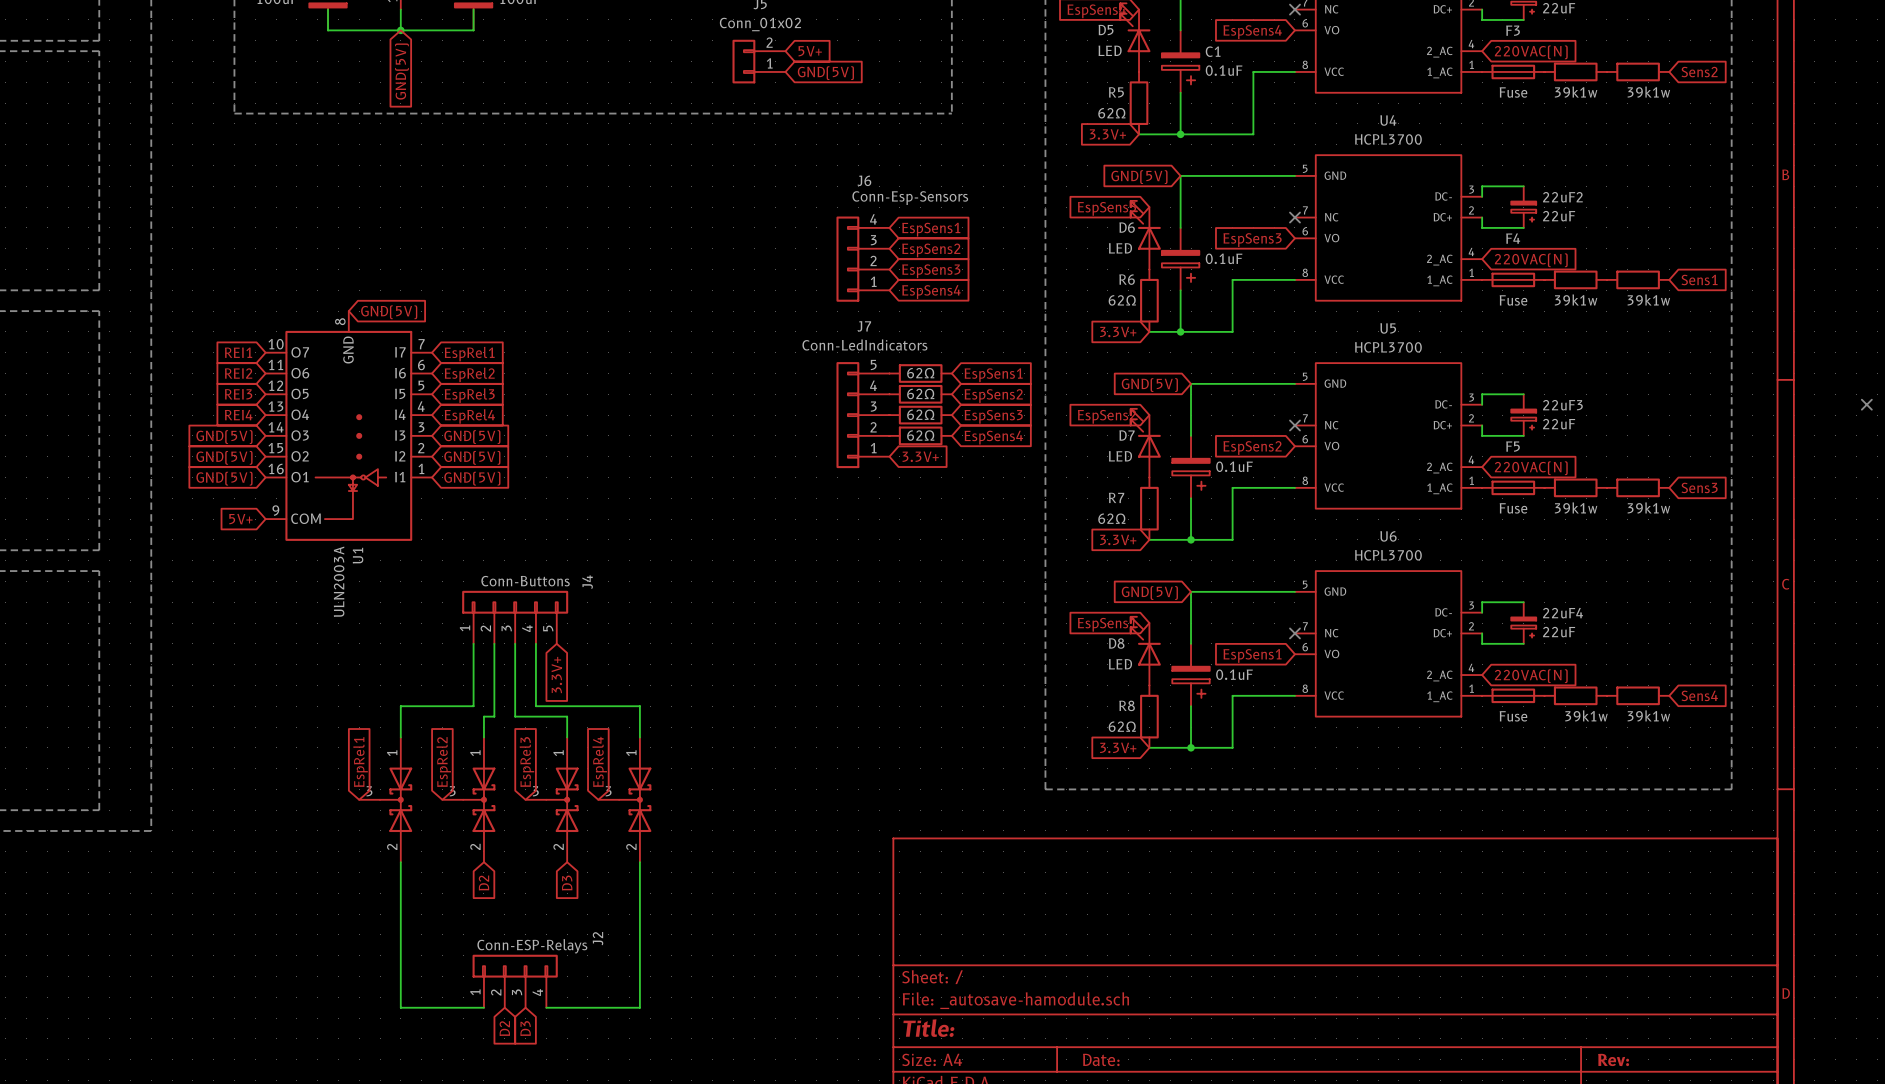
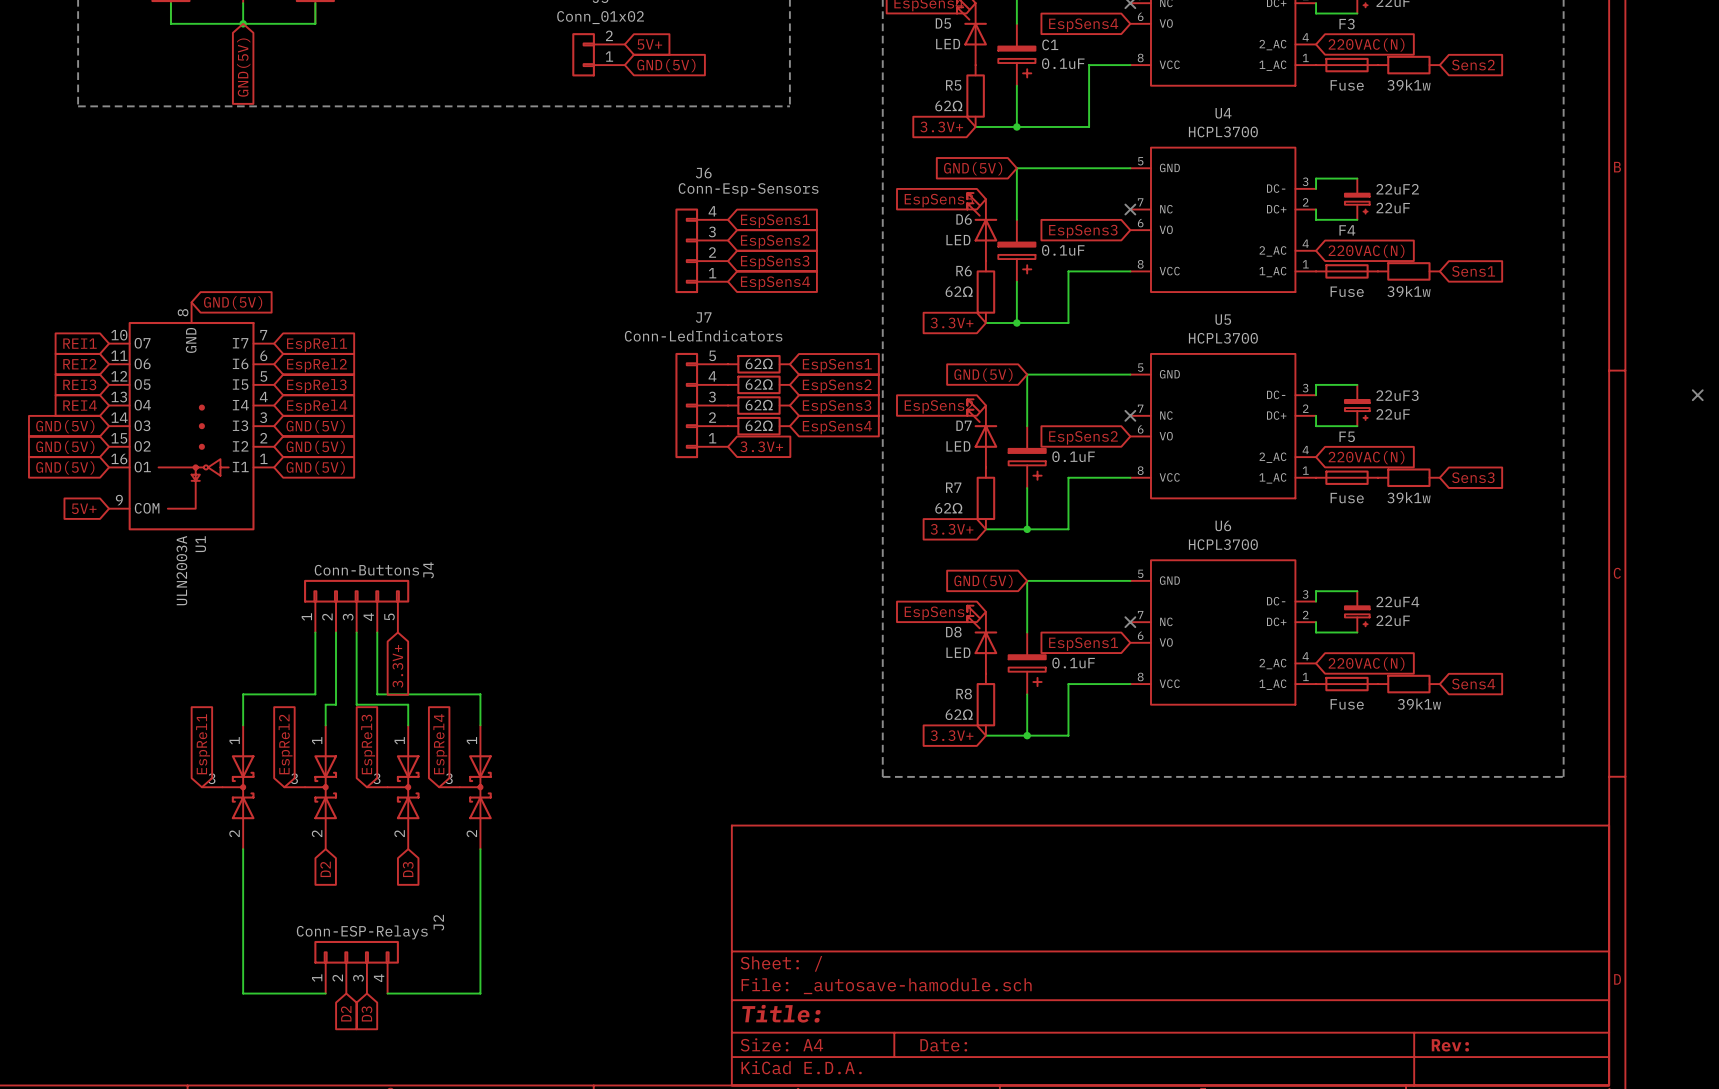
part: 39k1w (1638, 71) -> none
global label position: Sens2 (1699, 72) -> Sens2 (1473, 65)
part: 39k1w (1638, 279) -> none
global label position: Sens1 (1699, 279) -> Sens1 (1473, 271)
part: 39k1w (1638, 487) -> none
global label position: Sens3 (1699, 487) -> Sens3 (1473, 477)
part: 39k1w (1638, 695) -> none
global label position: Sens4 (1699, 695) -> Sens4 (1473, 684)

